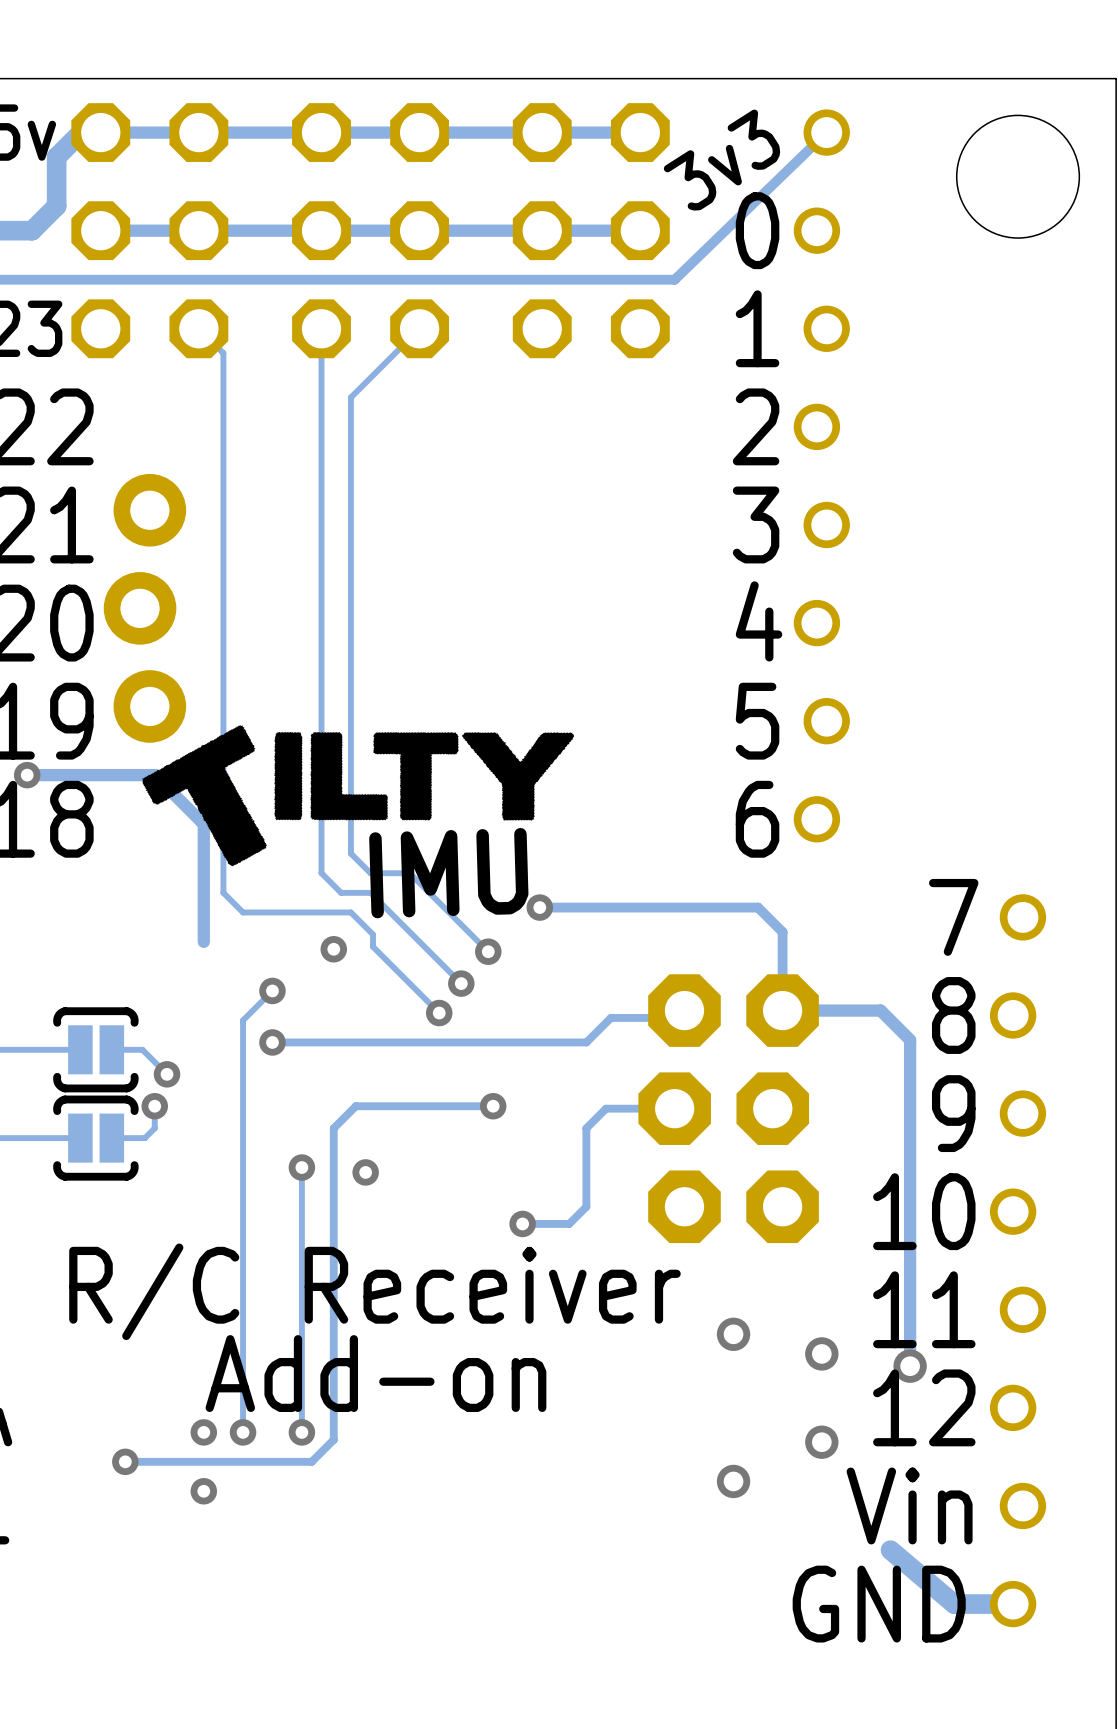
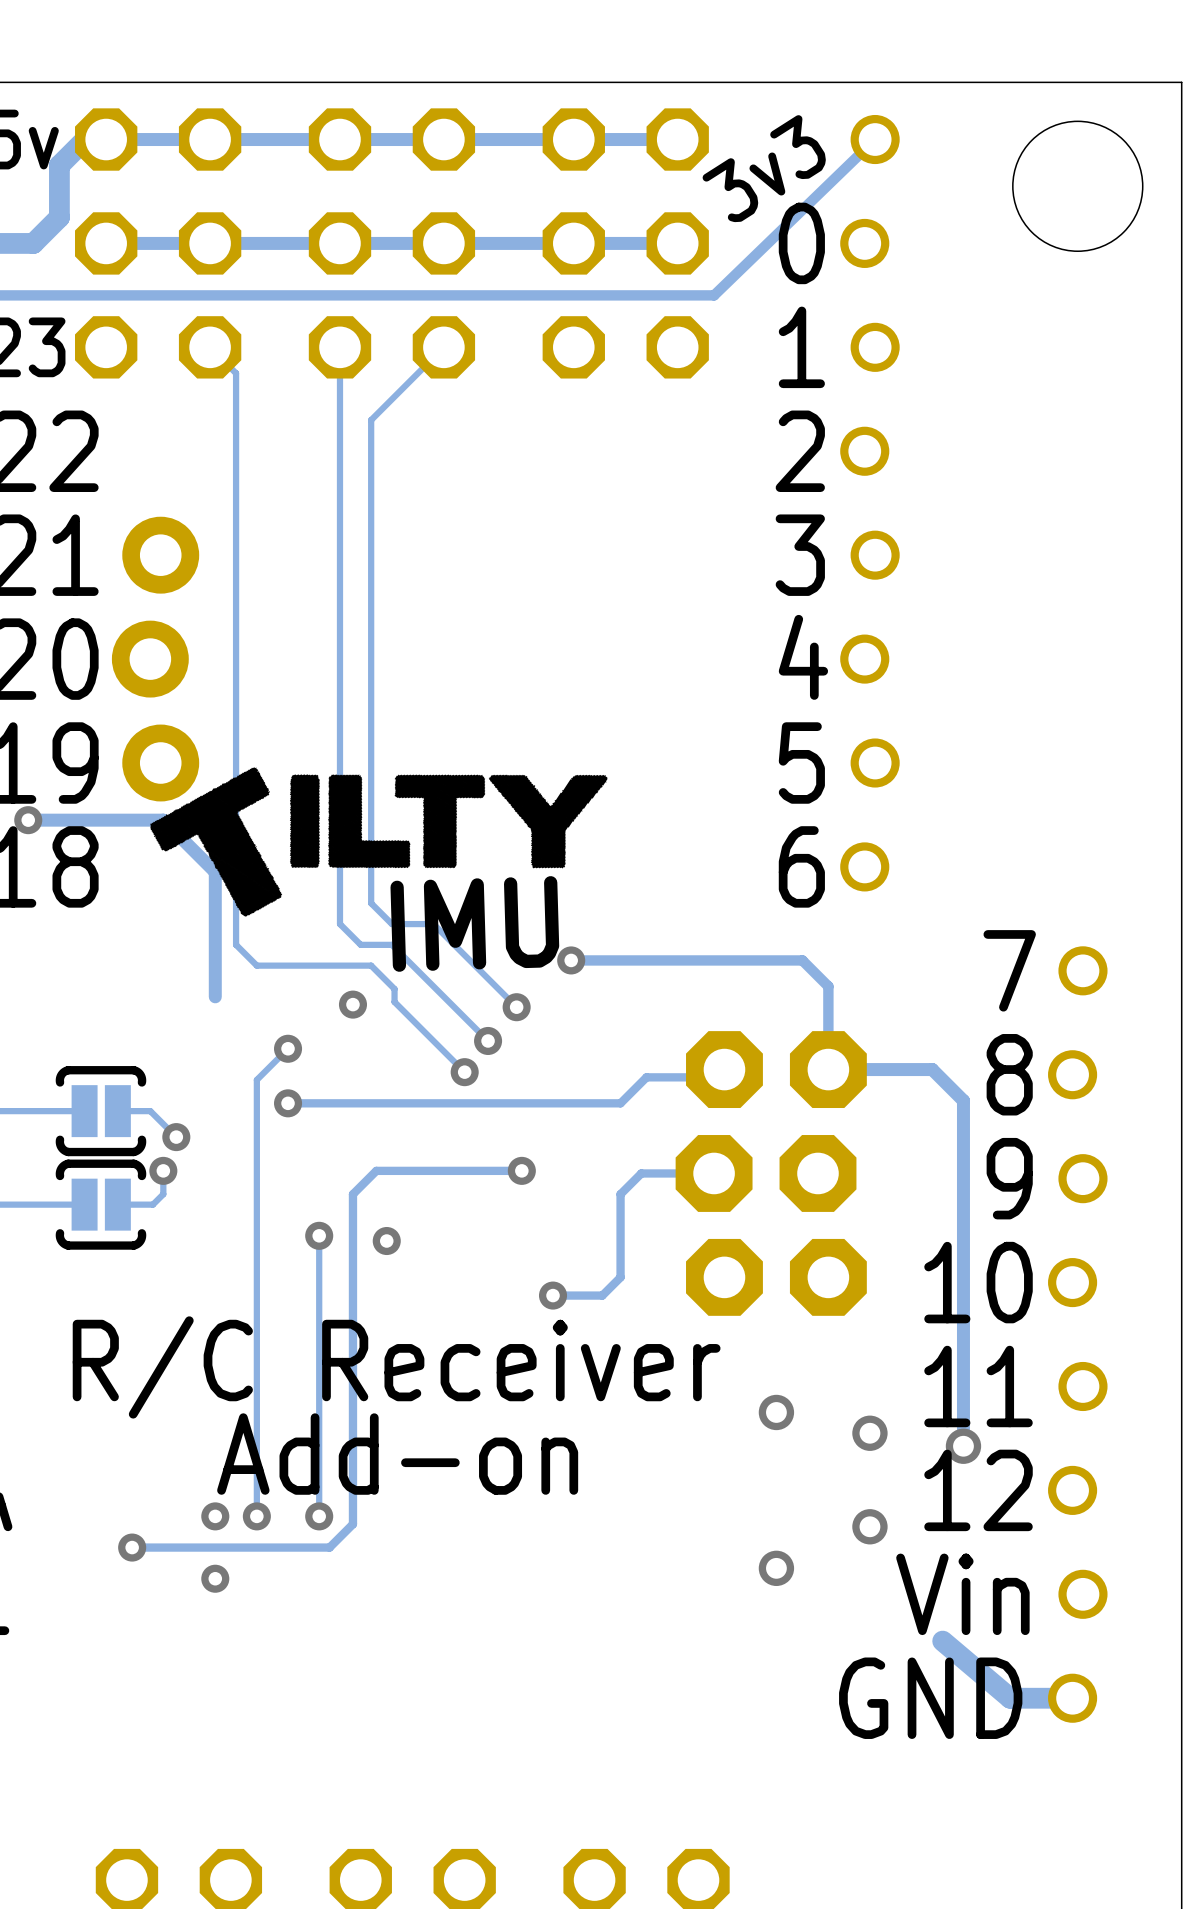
part position: (144, 608) -> (155, 659)

